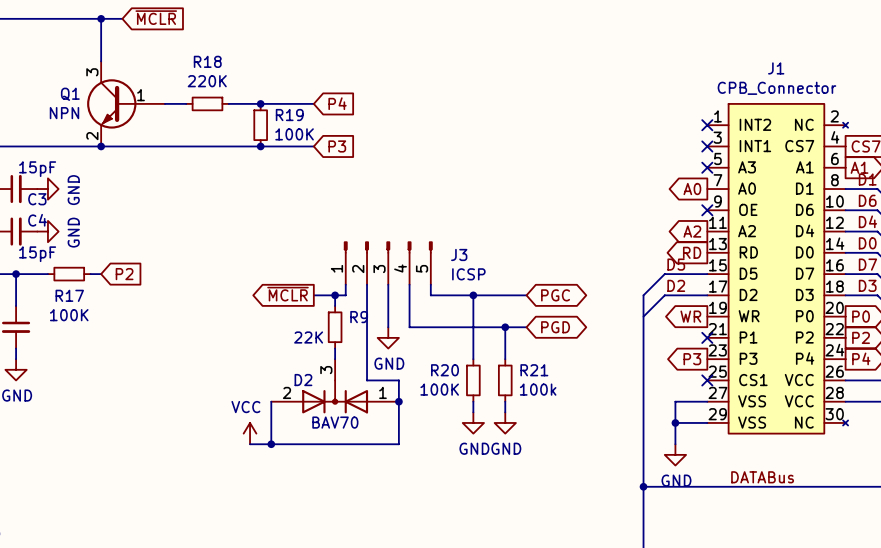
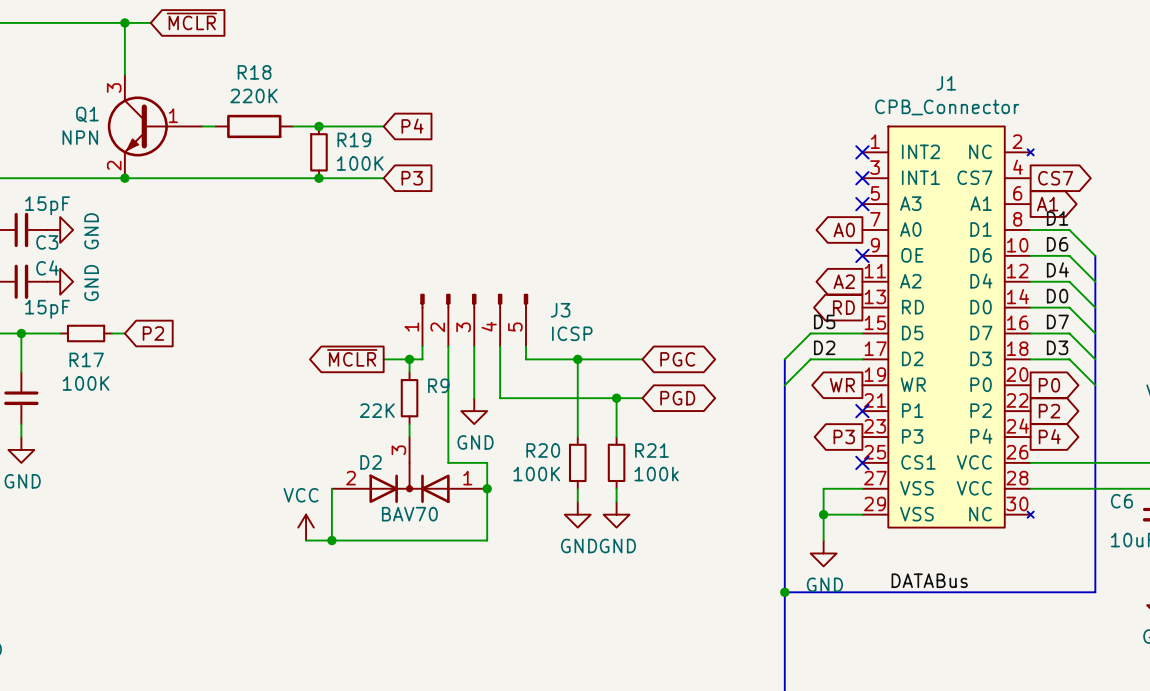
R18 symbol: [186, 96, 229, 112] -> [215, 114, 294, 139]

